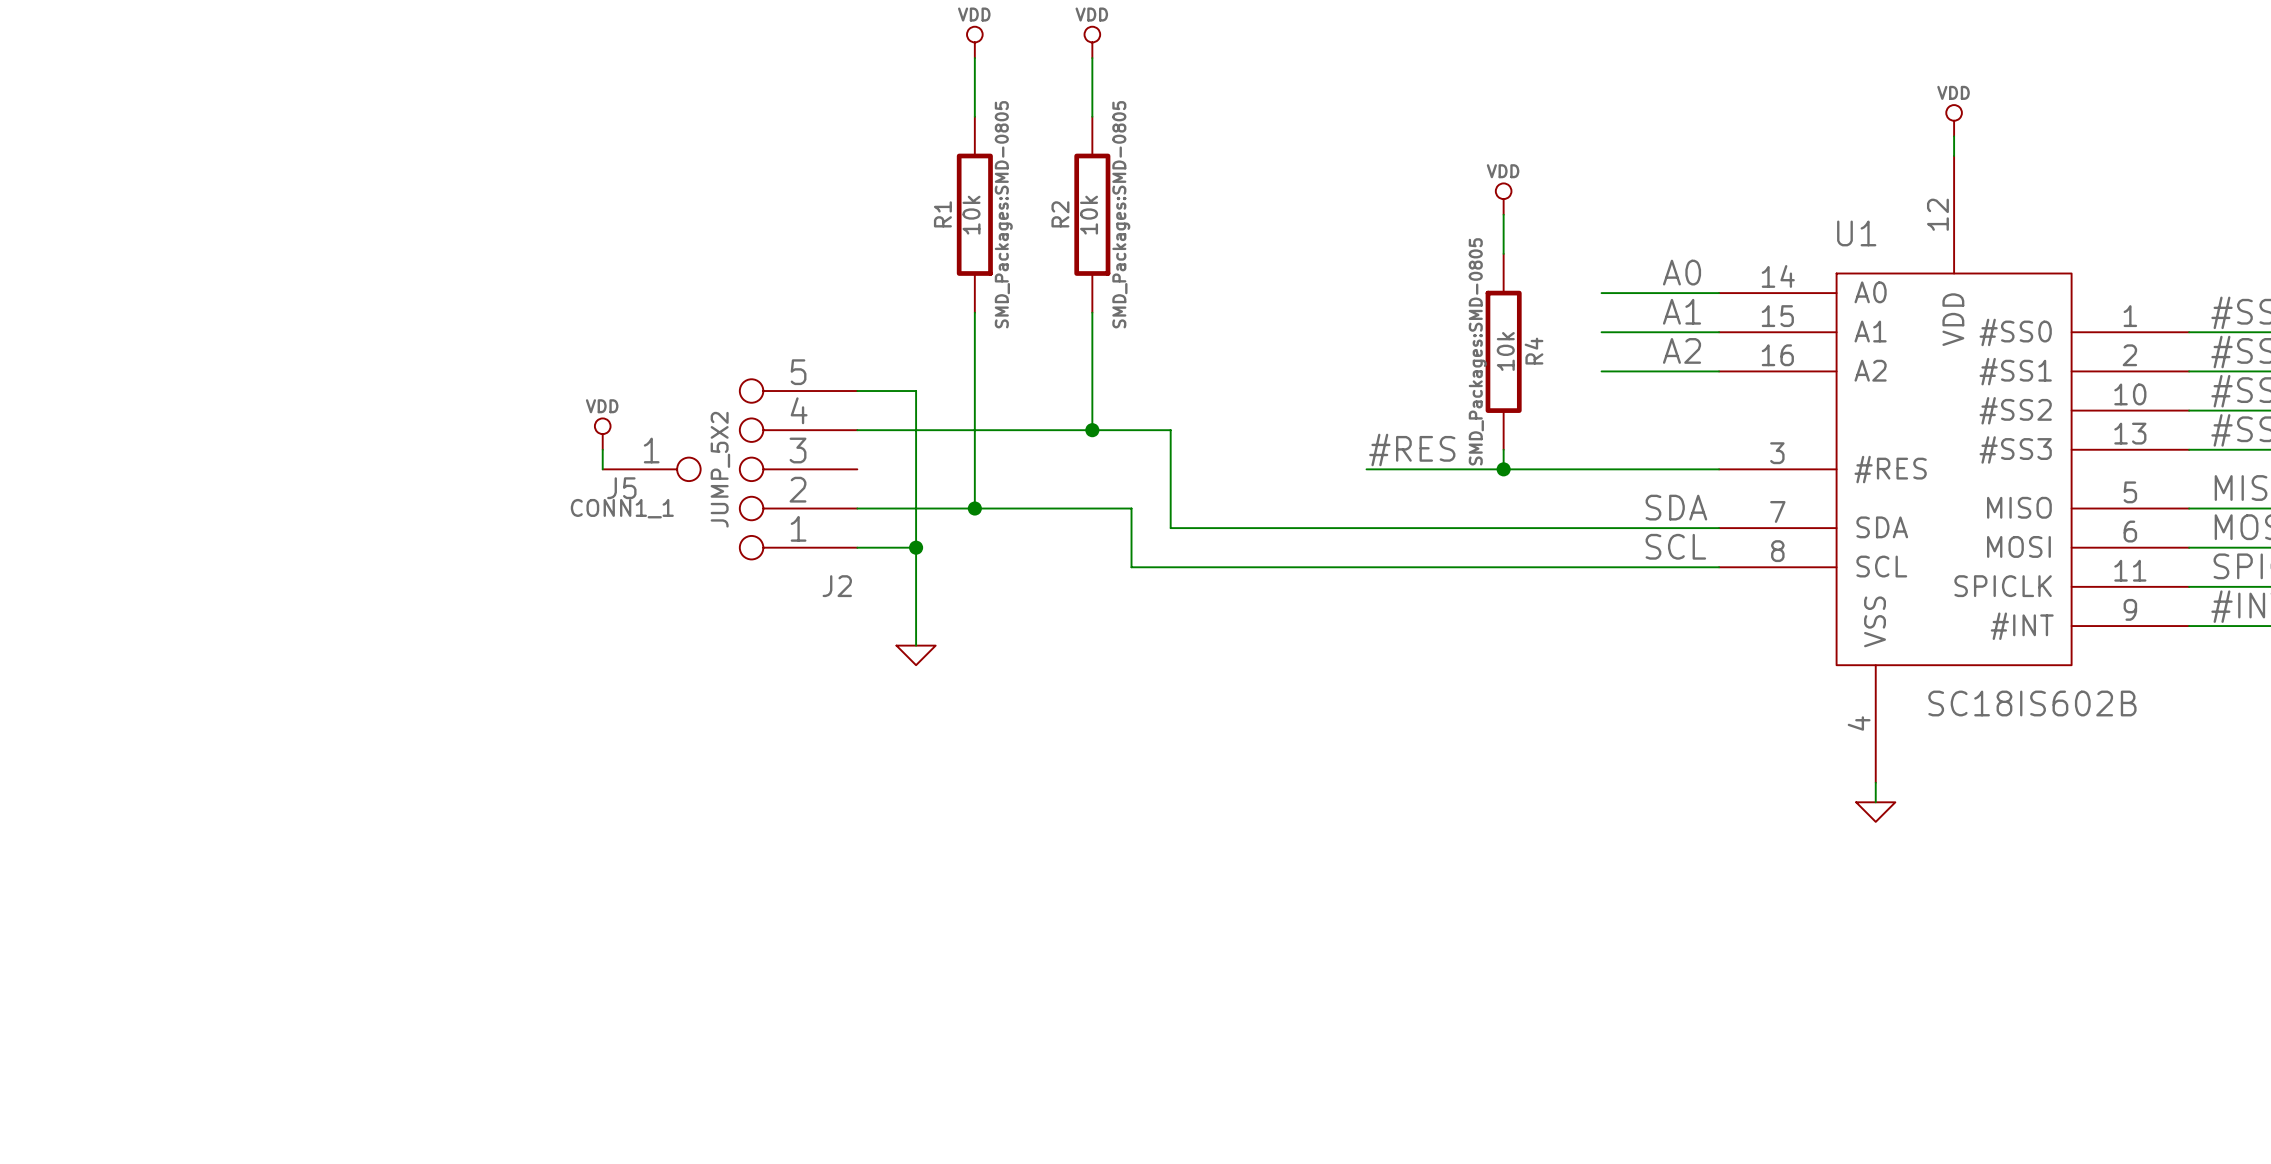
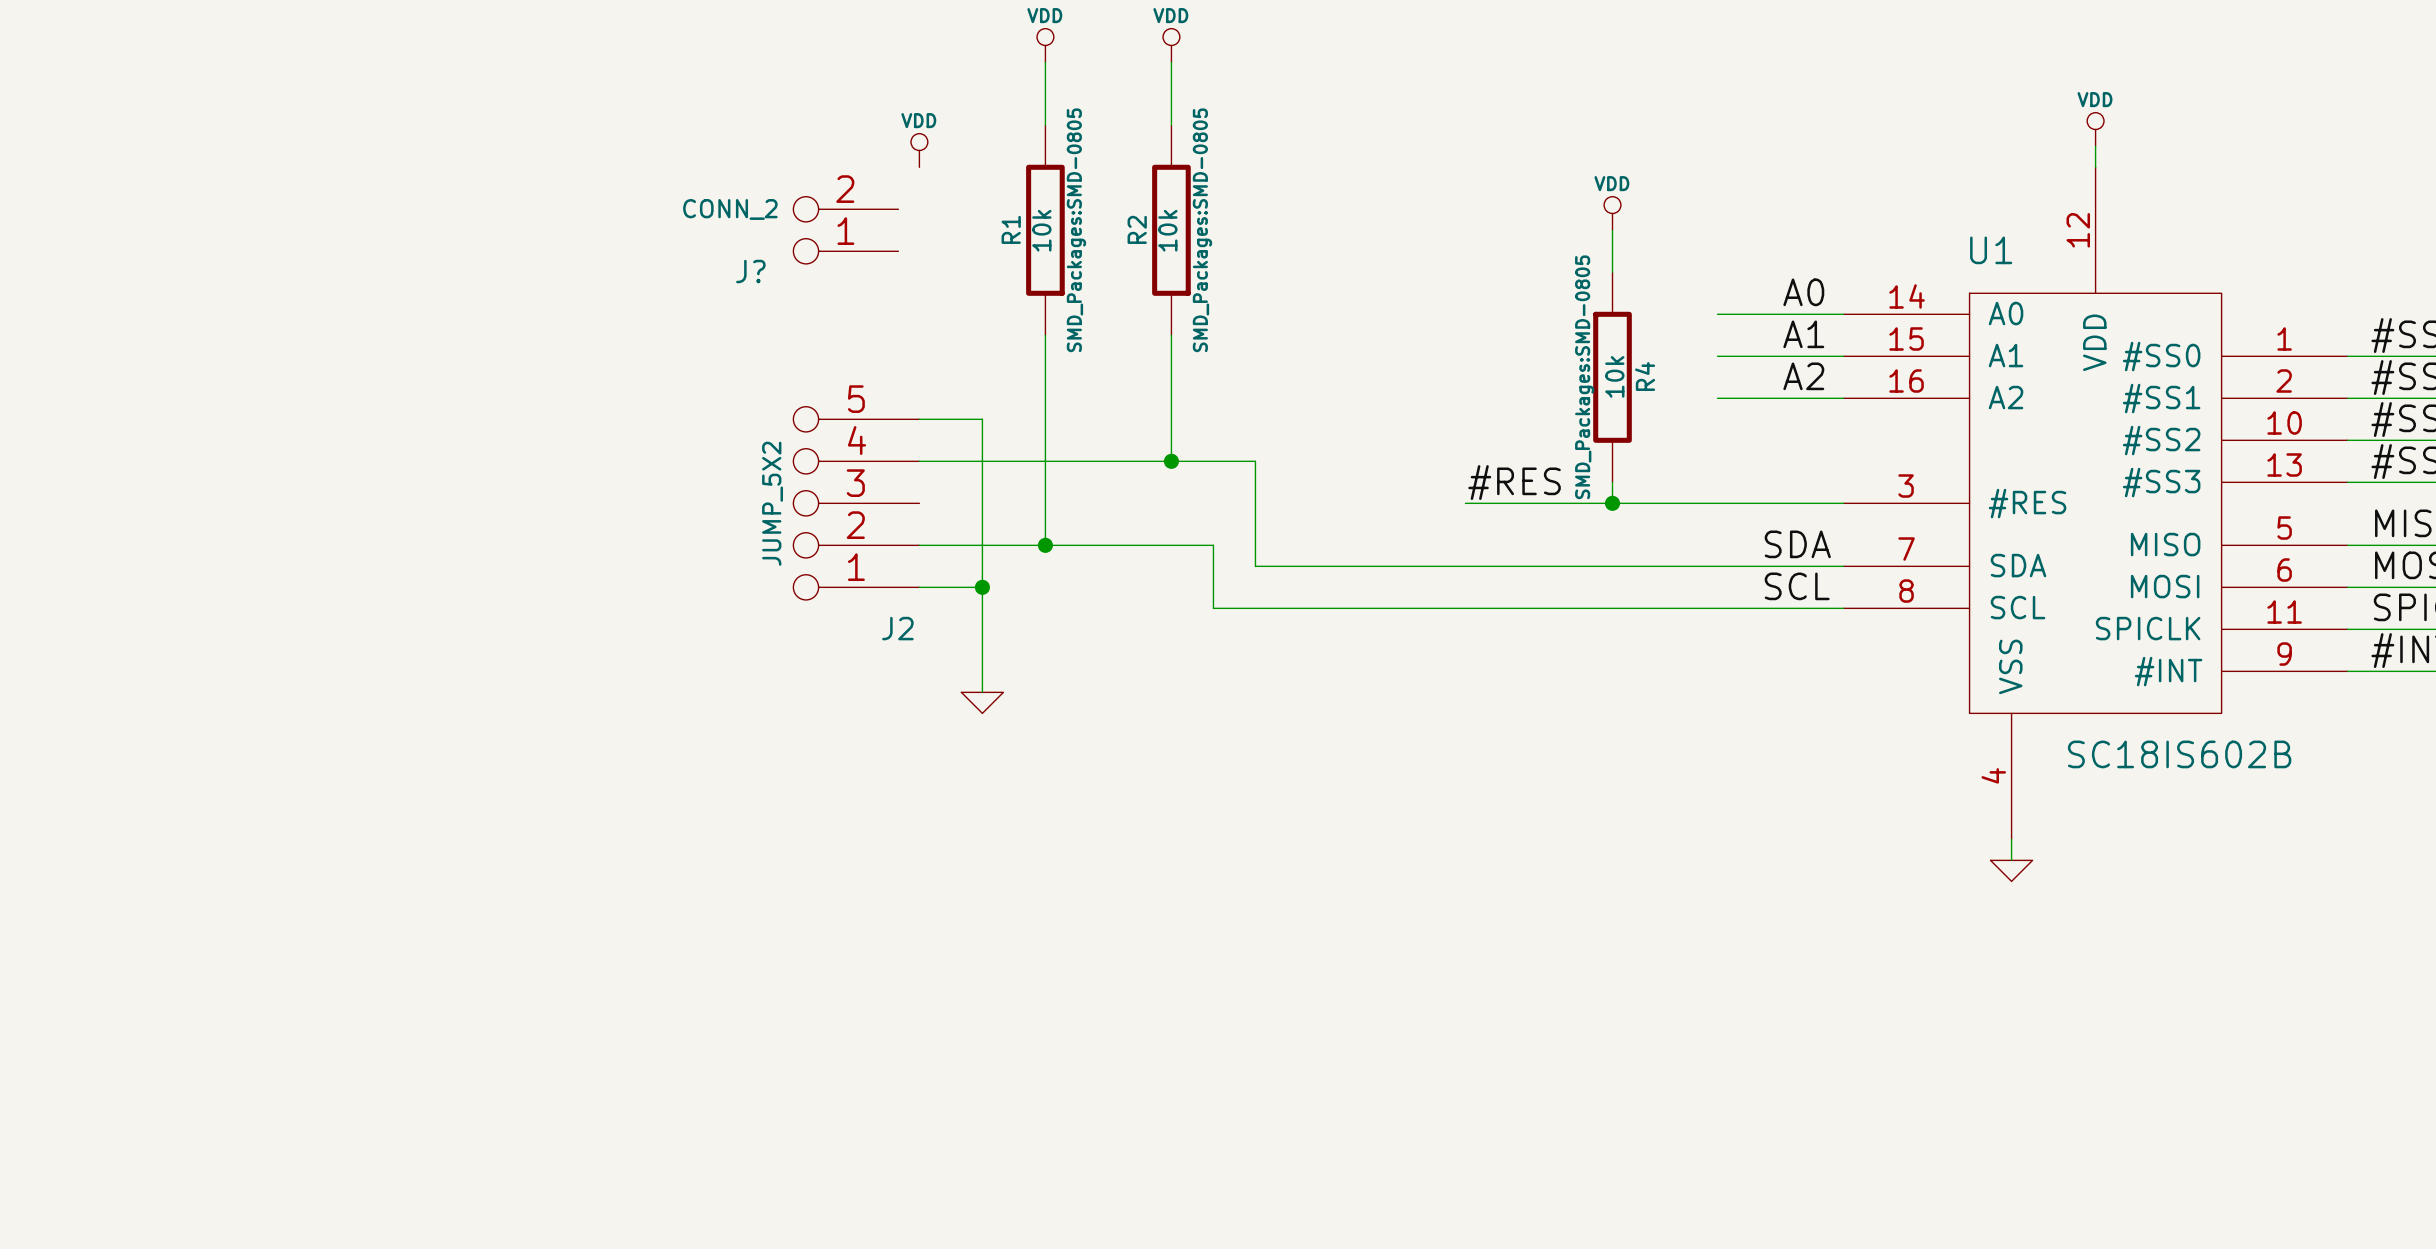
power symbol: none -> VDD (919, 150)
J?: none -> CONN_2 (845, 230)
power symbol: VDD (602, 434) -> none
wire: (602, 449) (602, 469) -> none
J5: CONN1_1 (651, 469) -> none

